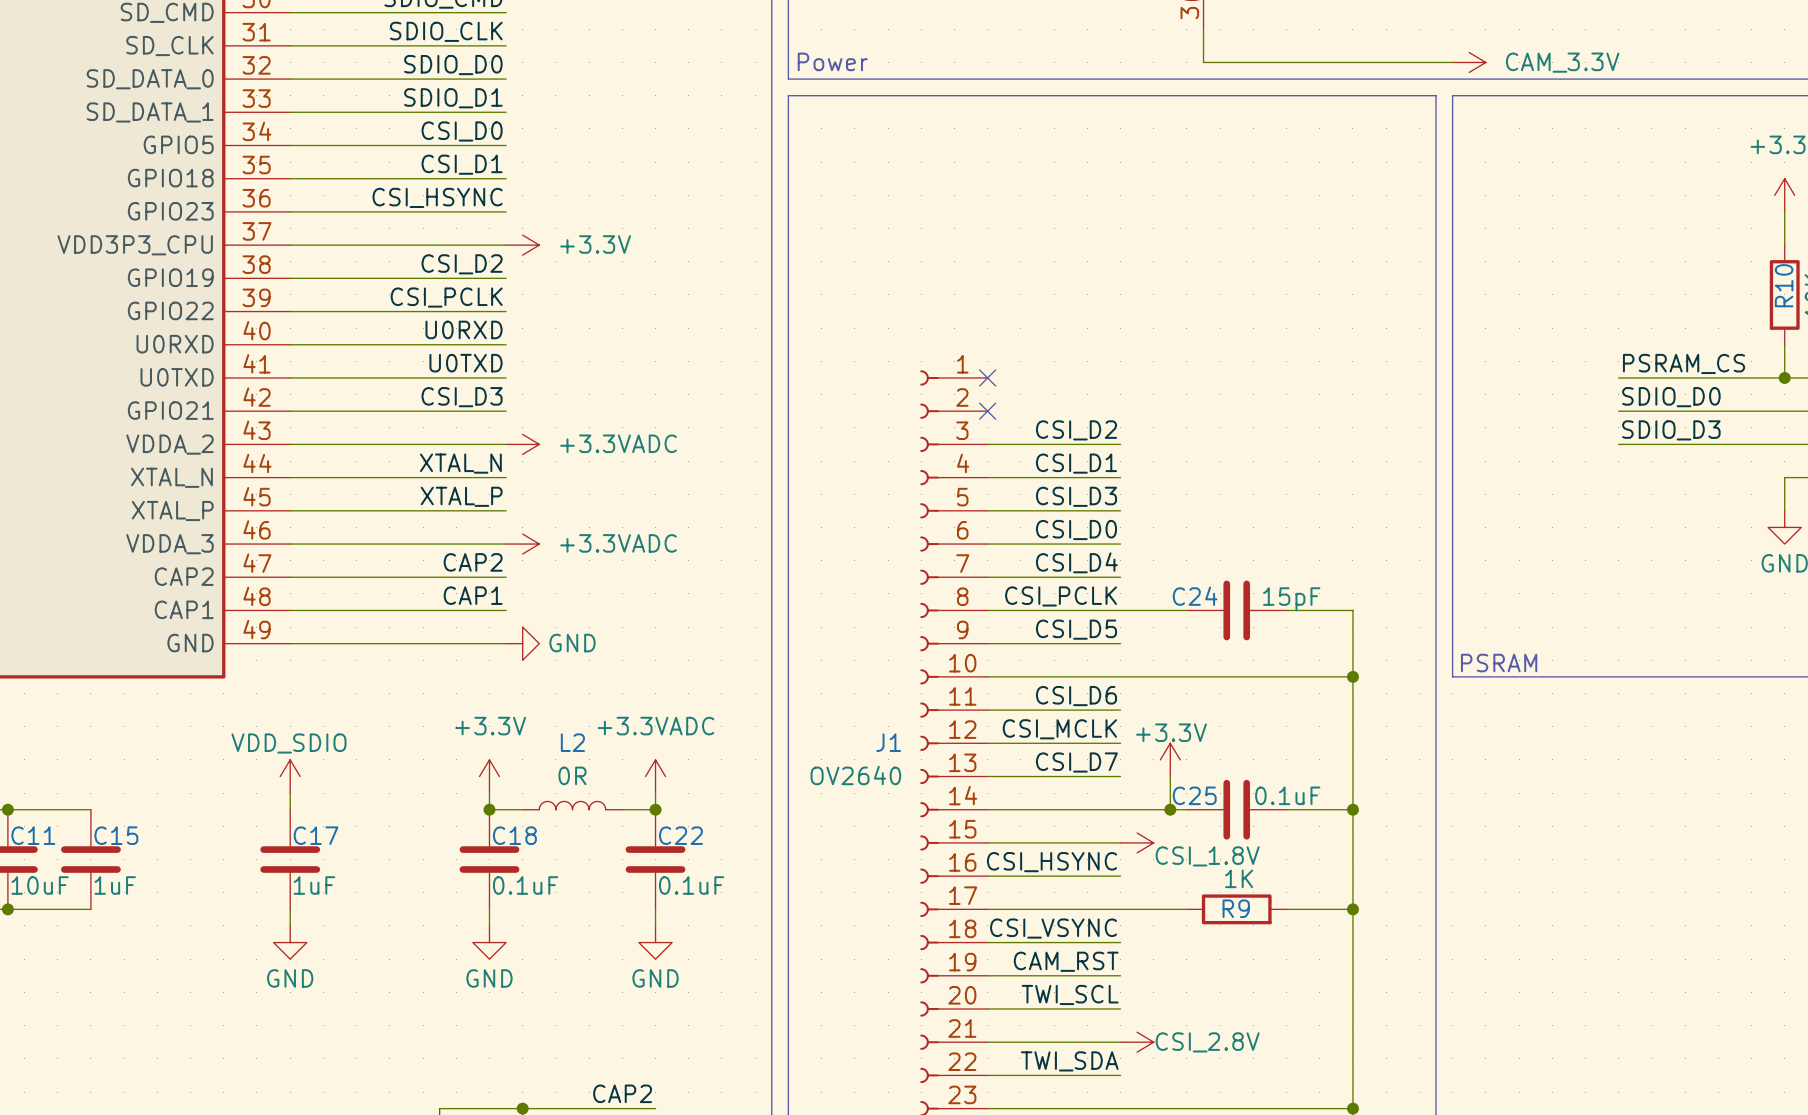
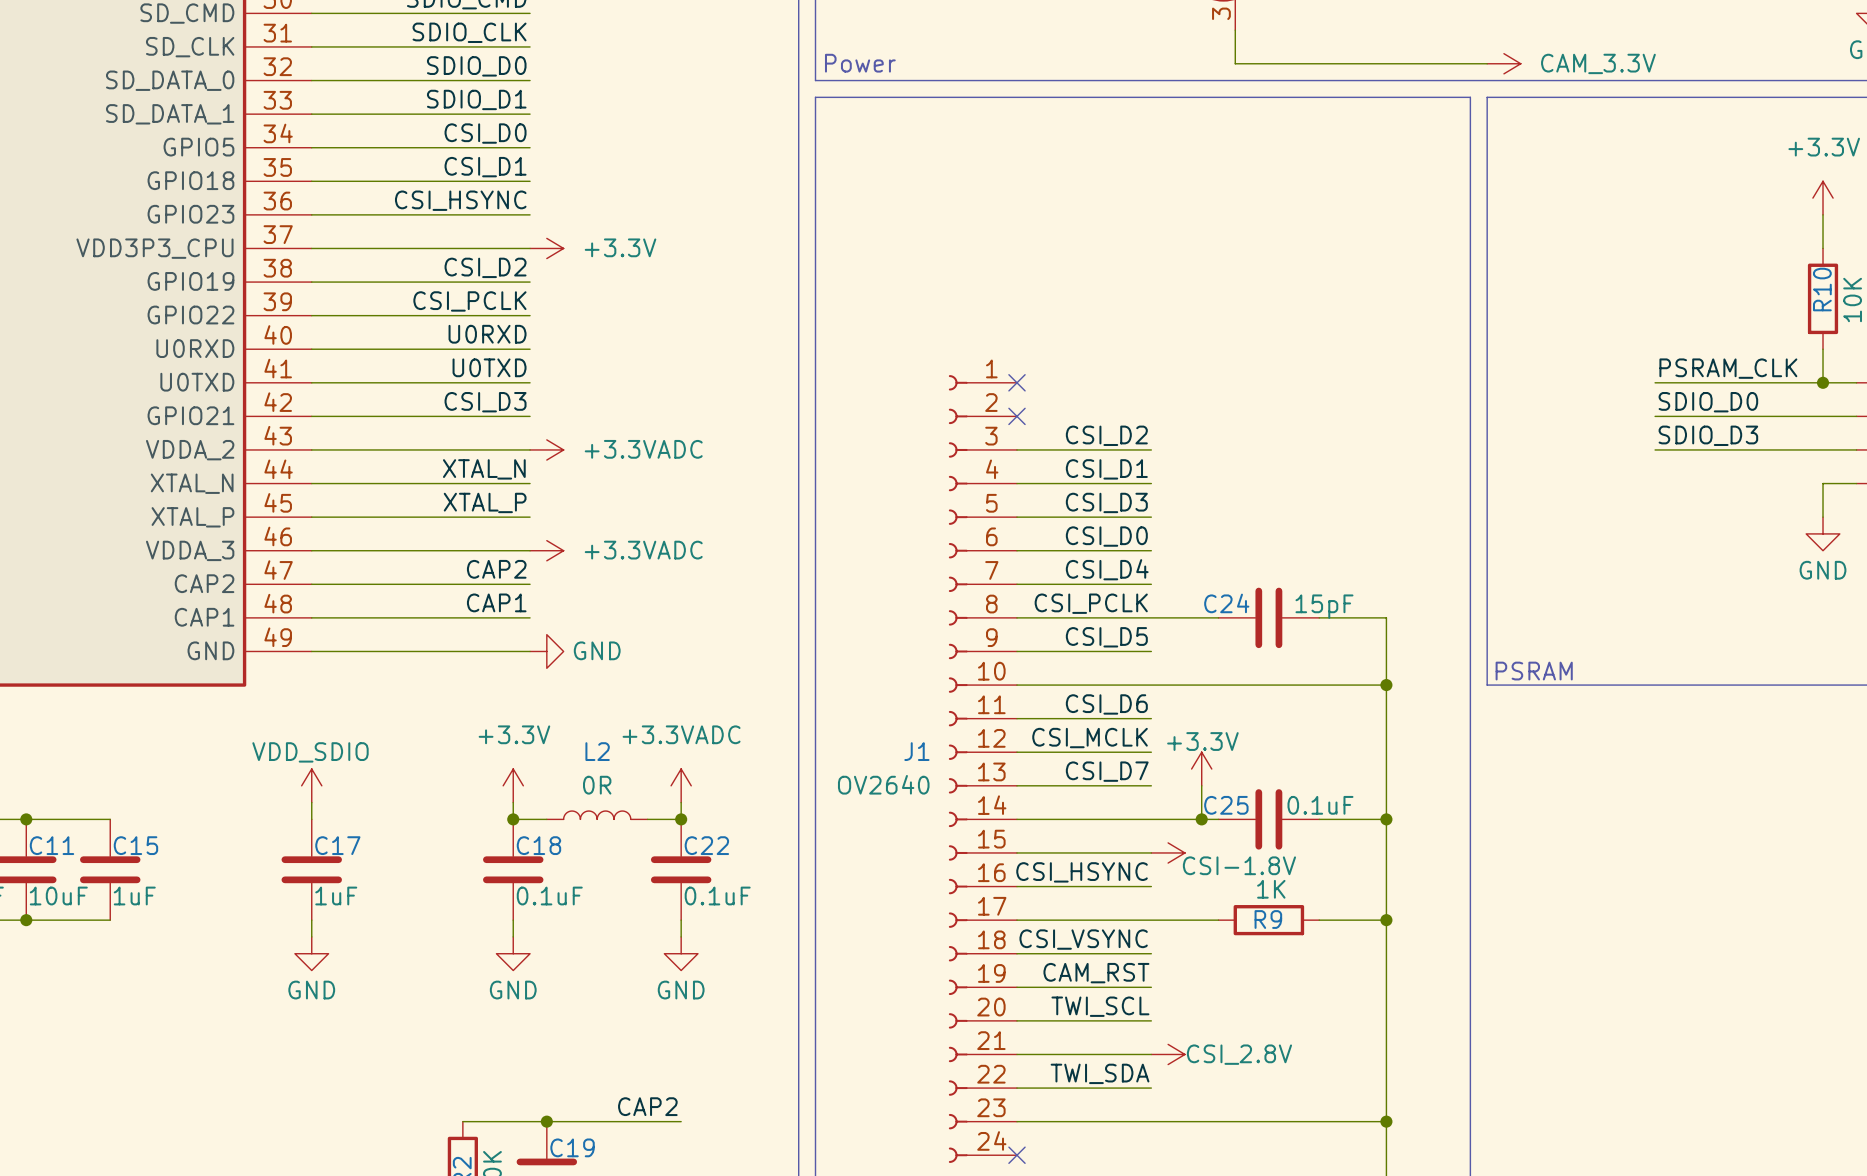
label: PSRAM_CS (1684, 363) -> PSRAM_CLK (1728, 368)
power symbol: CSI_1.8V (1137, 842) -> CSI-1.8V (1168, 852)

